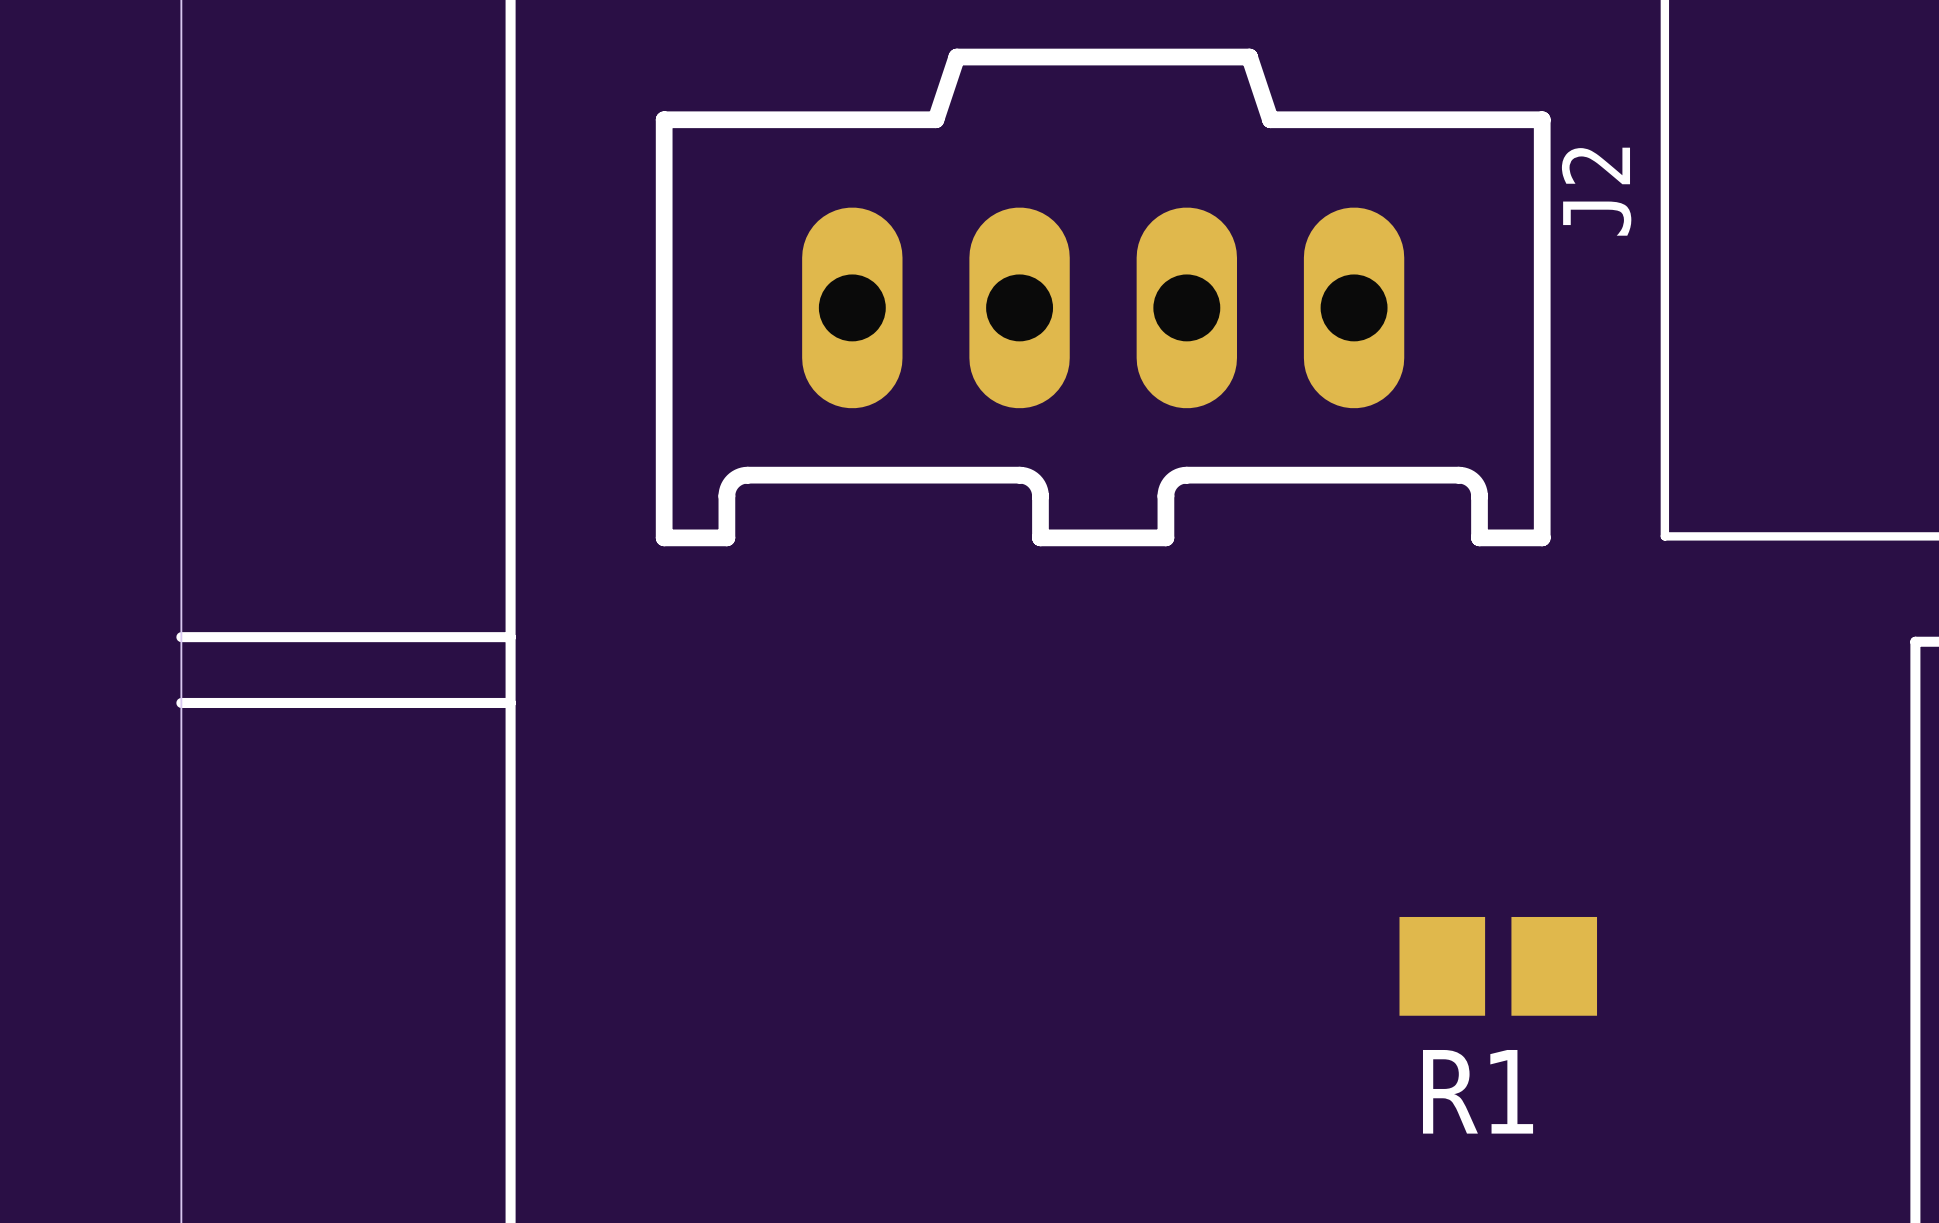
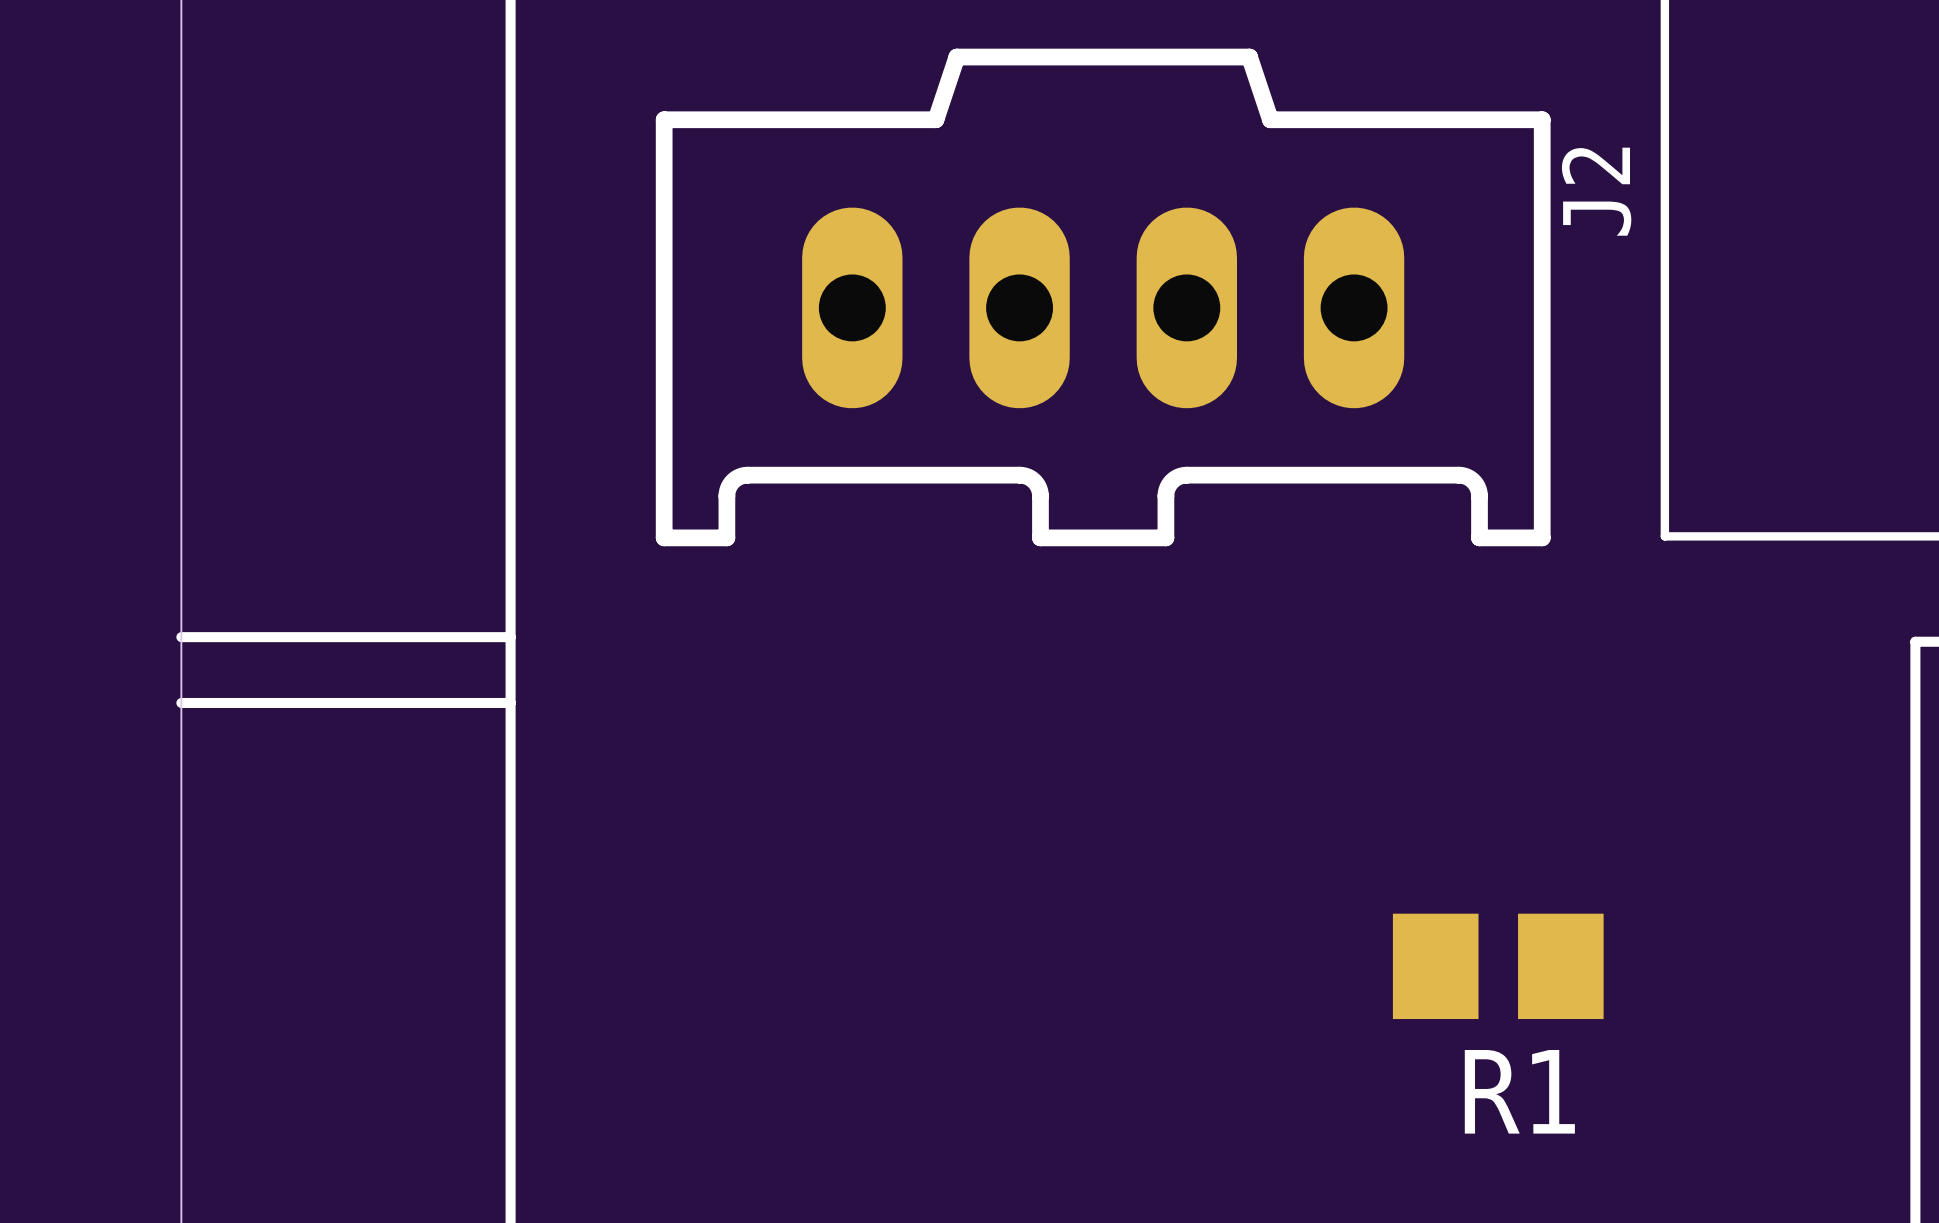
R1 footprint: [1399, 916, 1598, 1016] -> [1392, 913, 1604, 1020]
R1 name position: R1 (1478, 1091) -> R1 (1519, 1091)

